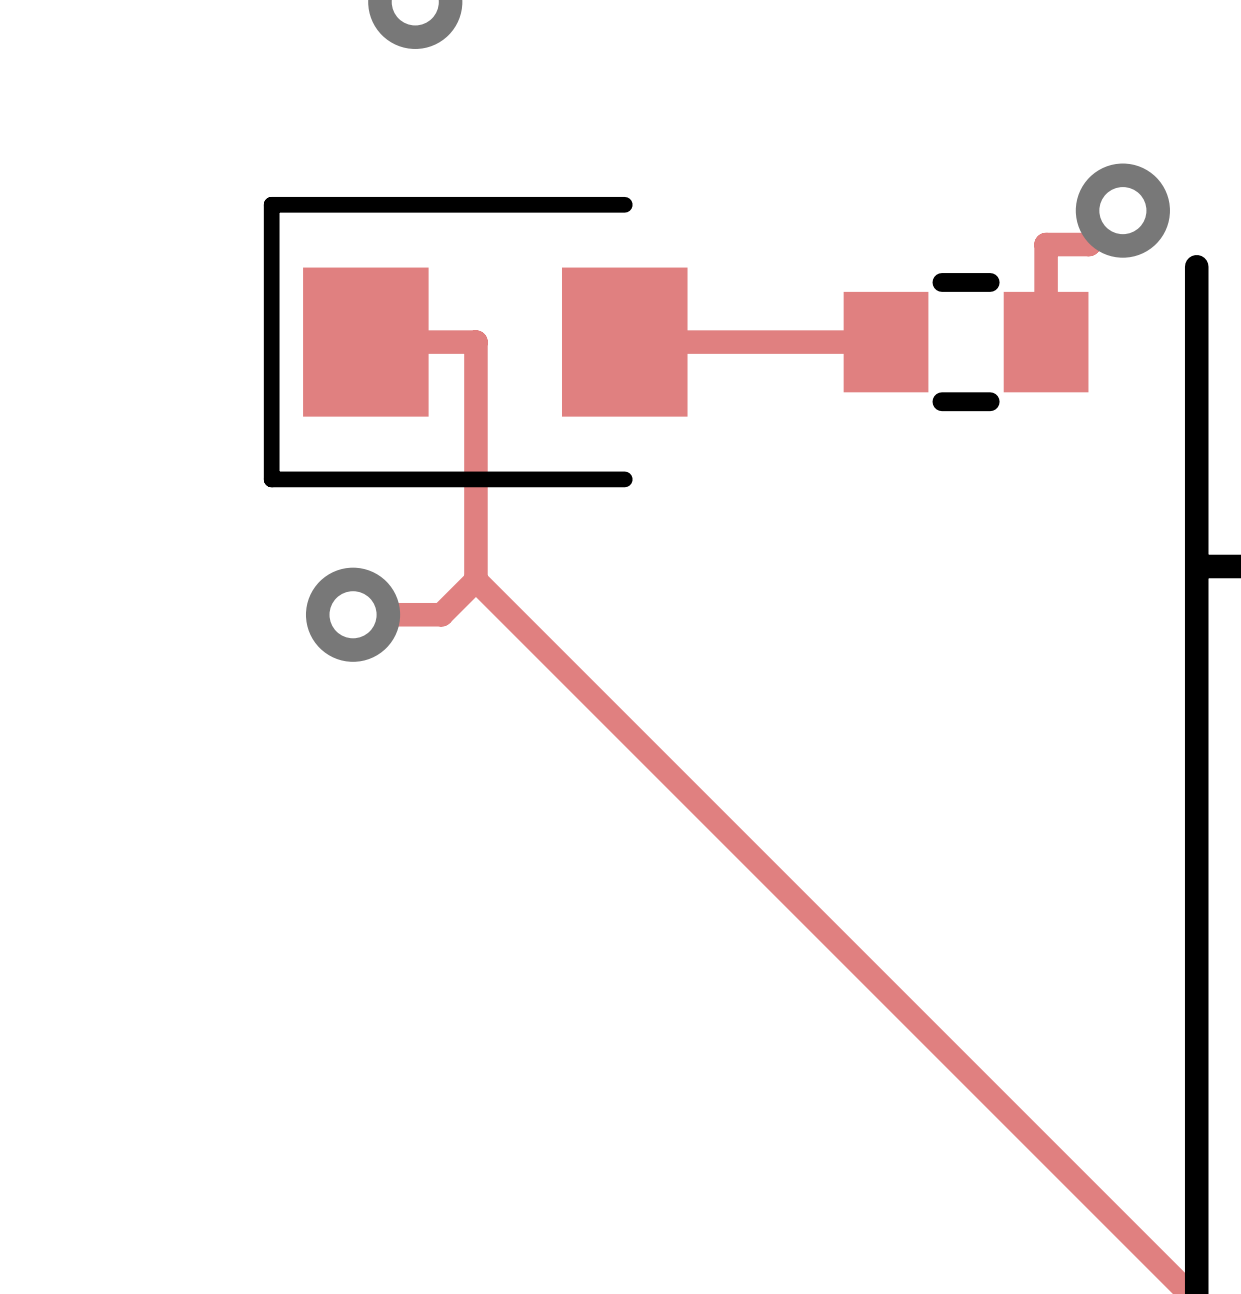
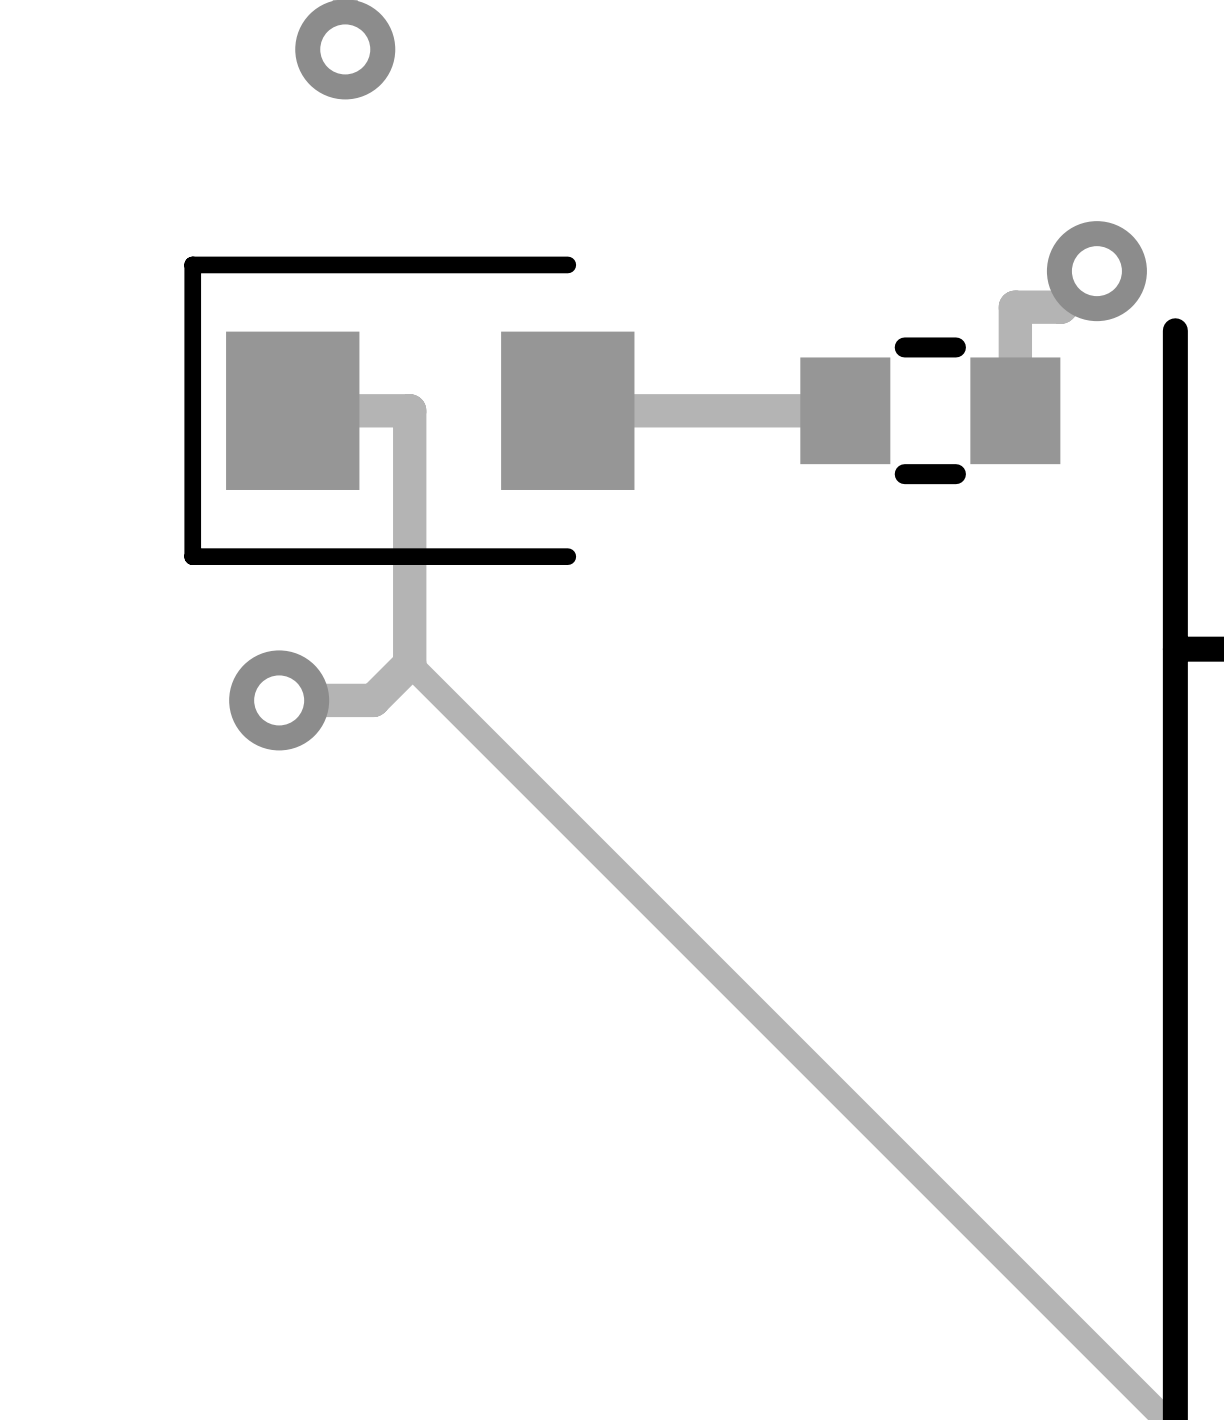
track width: thin (1122, 210) (1088, 244) (1046, 244) (1046, 342) -> thick (1096, 271) (1060, 307) (1015, 307) (1015, 410)
track width: thin (365, 342) (475, 342) (475, 580) (441, 614) (353, 614) -> thick (292, 410) (409, 410) (409, 663) (373, 700) (279, 700)
track width: thin (624, 342) (886, 342) -> thick (567, 410) (845, 410)

